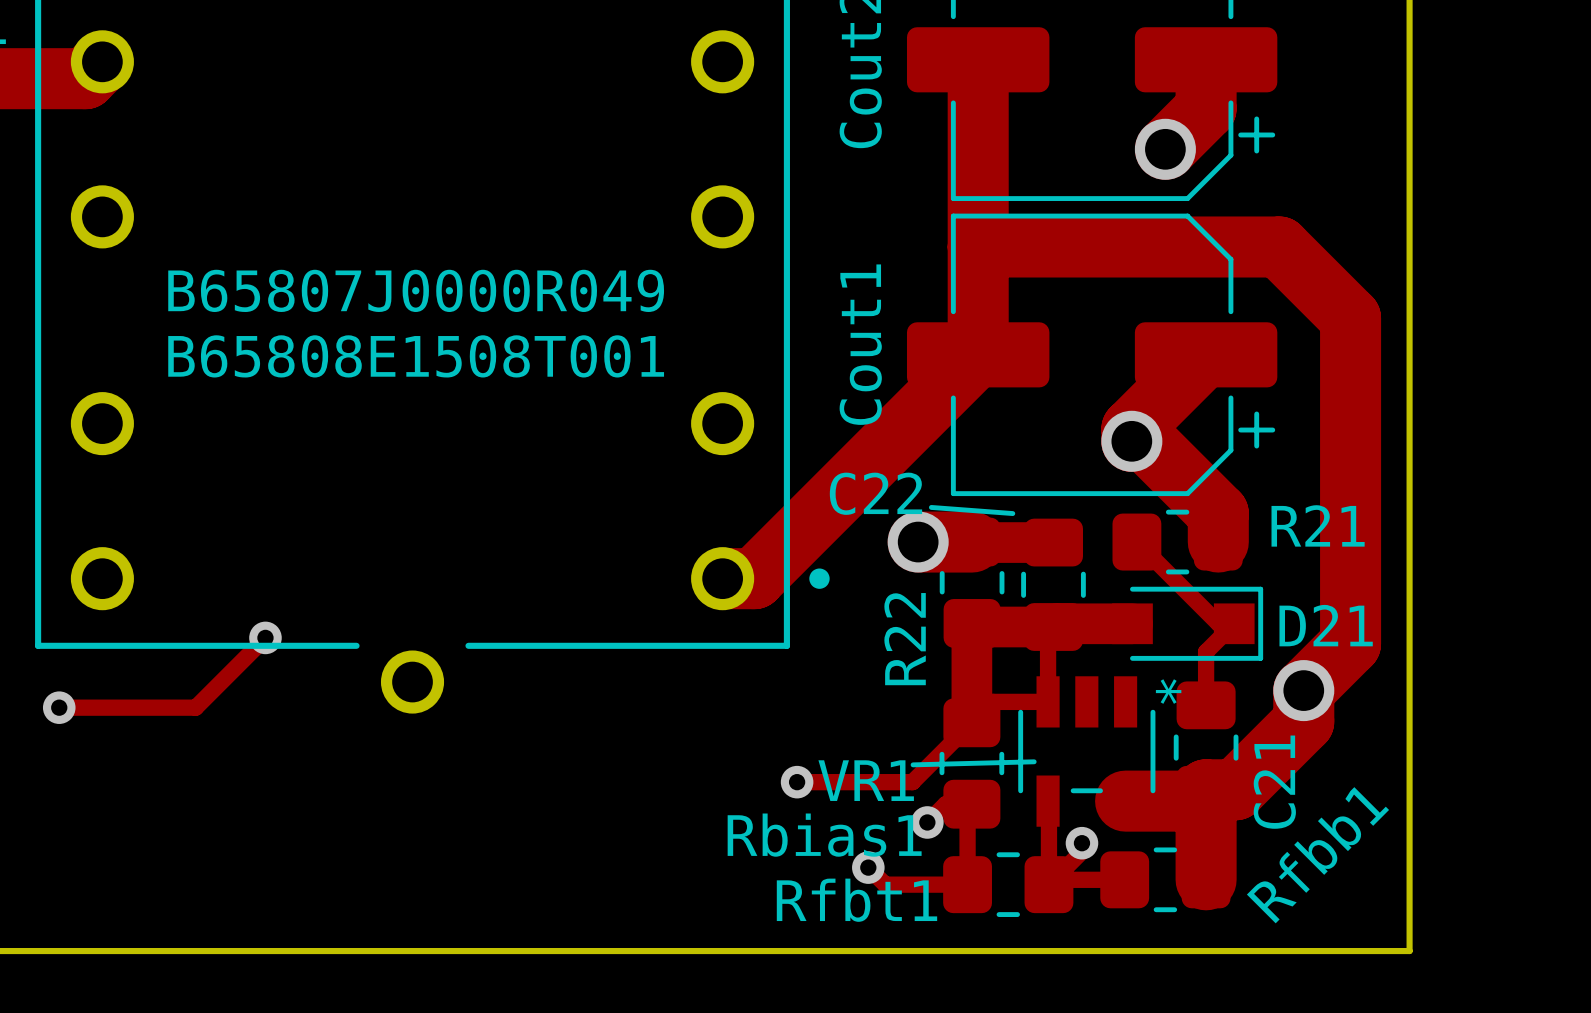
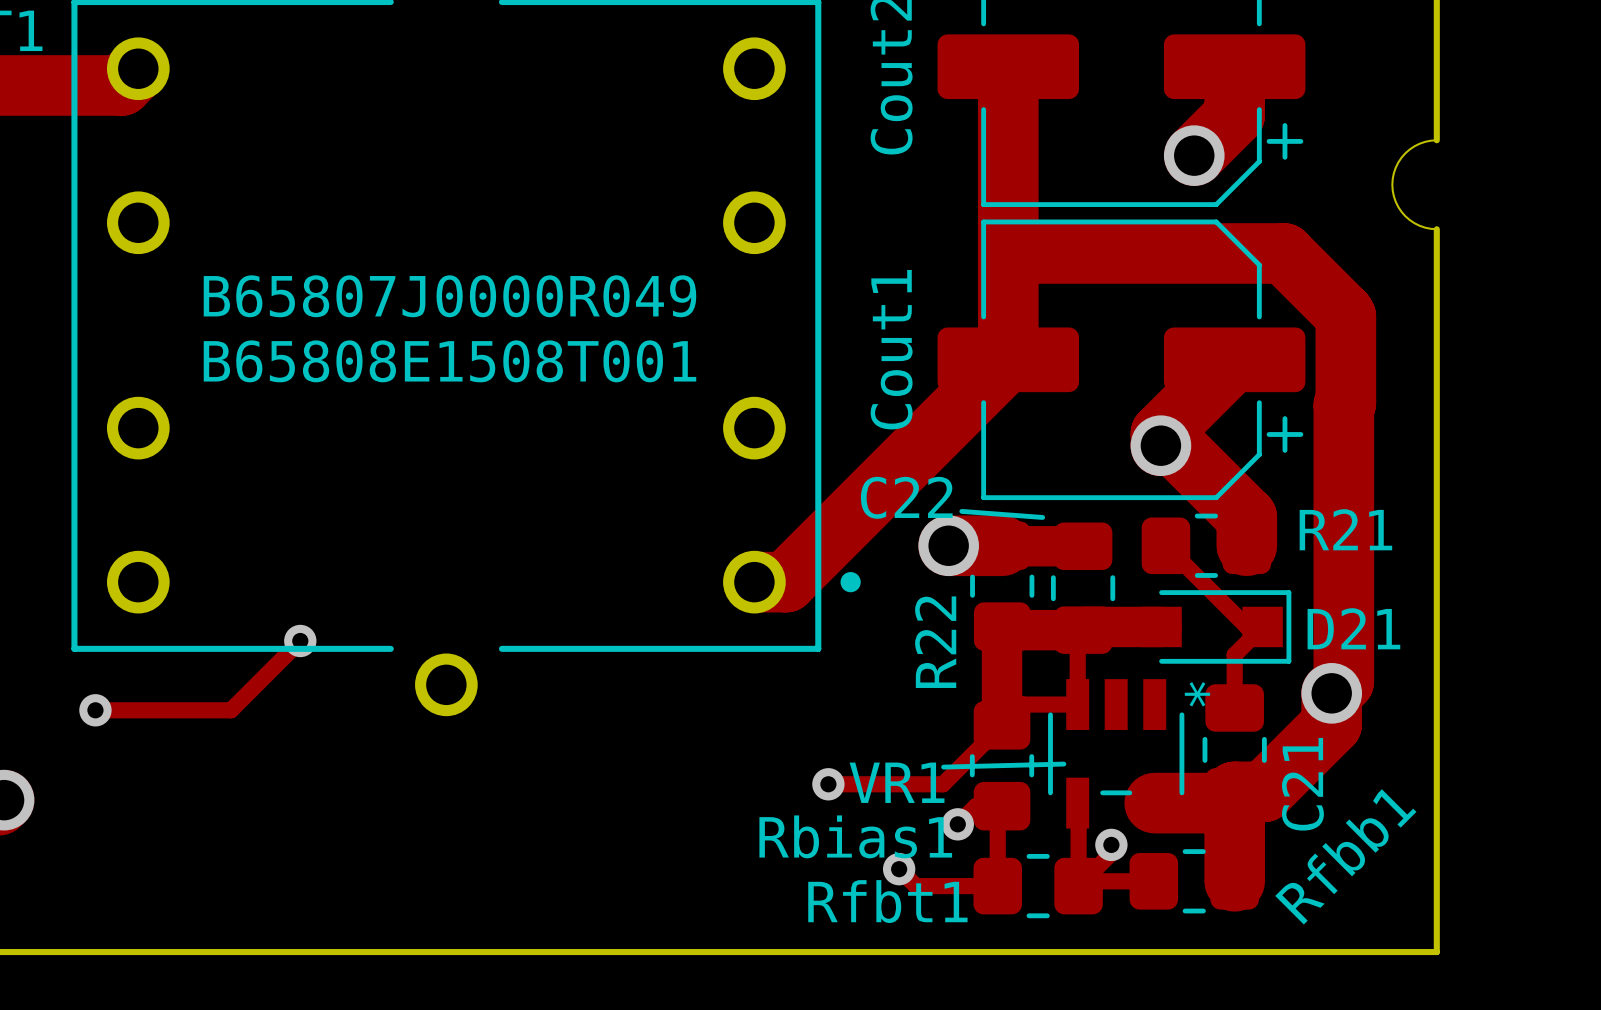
board edge: (1409, 133) (1409, 223) -> (1436, 140) (1419, 143) (1405, 153) (1395, 167) (1392, 184) (1395, 201) (1405, 216) (1419, 225) (1436, 229)
track: (978, 246) (1279, 246) (1350, 318) (1350, 643) (1315, 678) -> (1008, 252) (1284, 253) (1343, 313) (1345, 316) (1345, 402) (1343, 404) (1343, 681)

